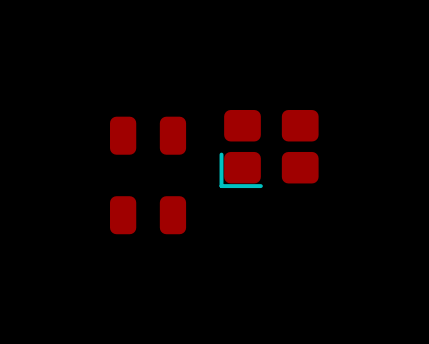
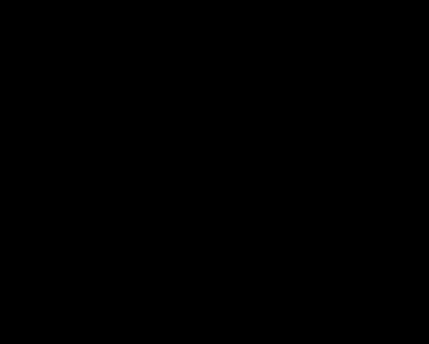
part: (148, 135) -> none
part: (269, 149) -> none
part: (148, 215) -> none

